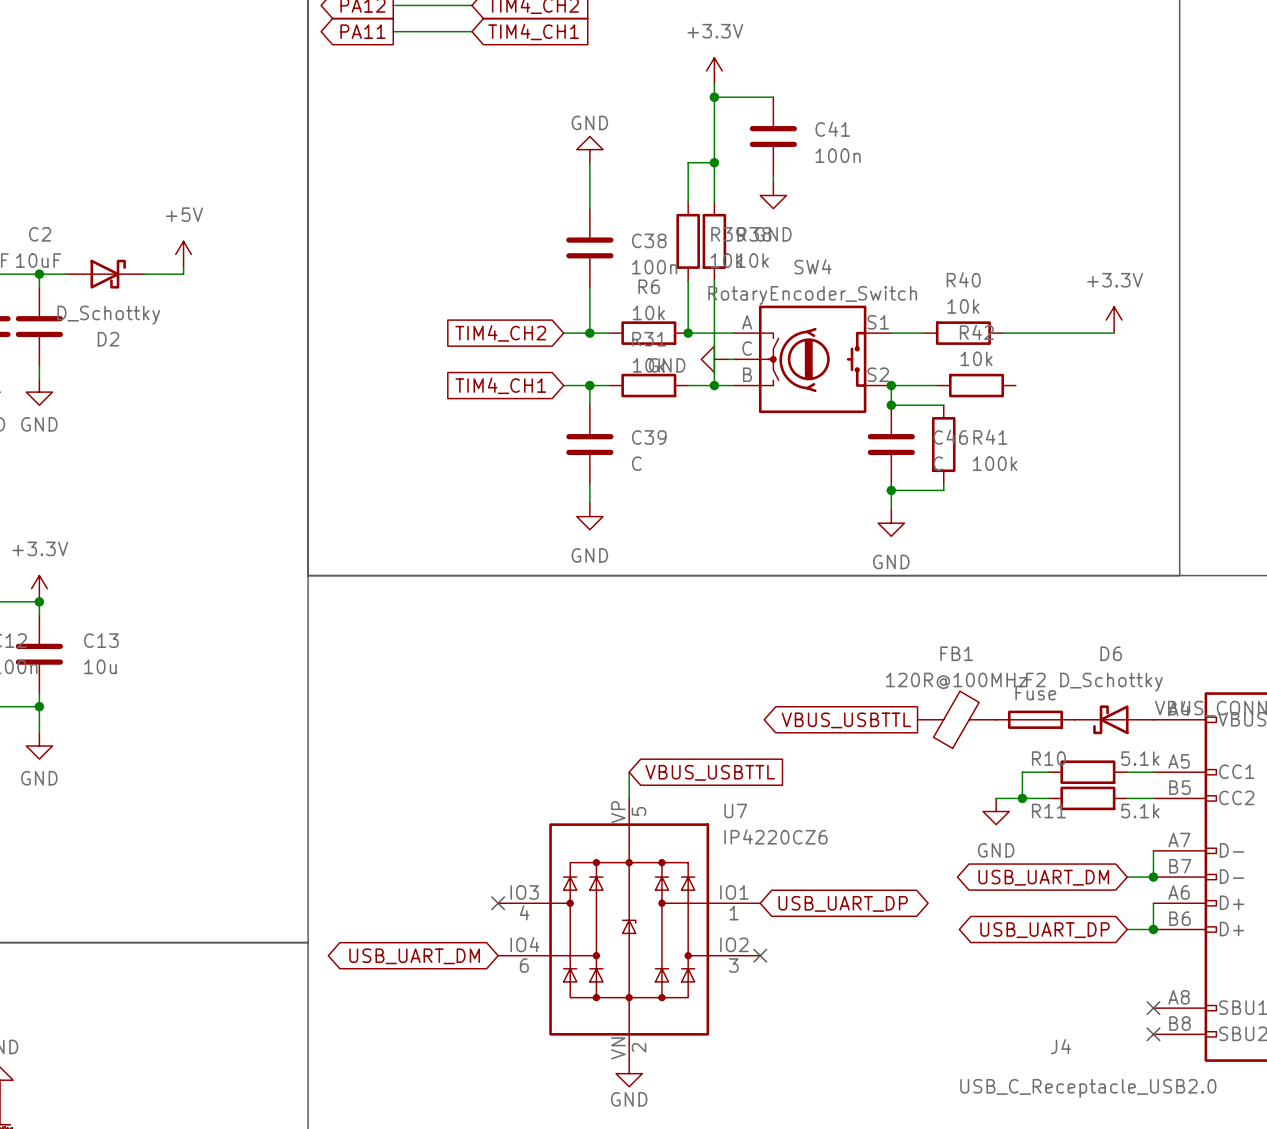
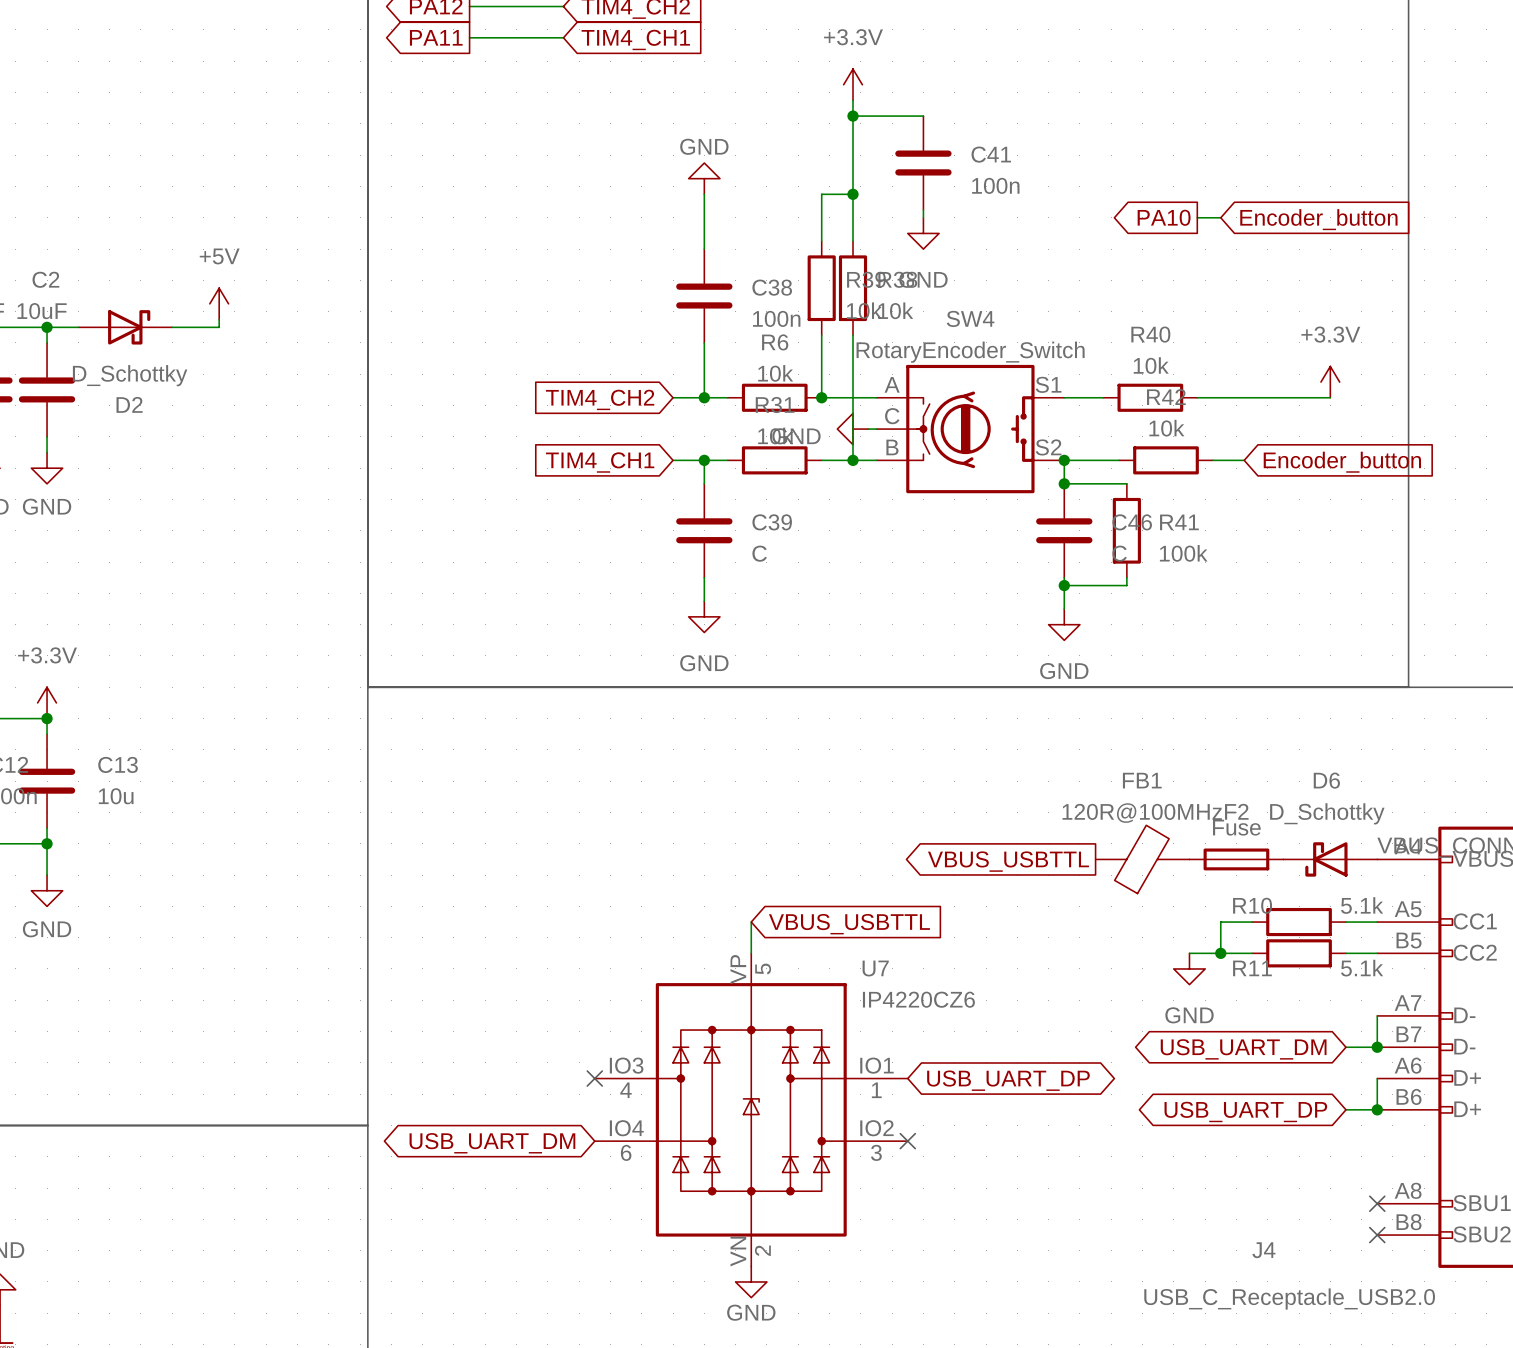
global label: none -> PA10 (1164, 217)
wire: none -> (1197, 217) (1220, 217)
global label: none -> Encoder_button (1318, 219)
wire: none -> (1212, 460) (1244, 460)
global label: none -> Encoder_button (1342, 462)

